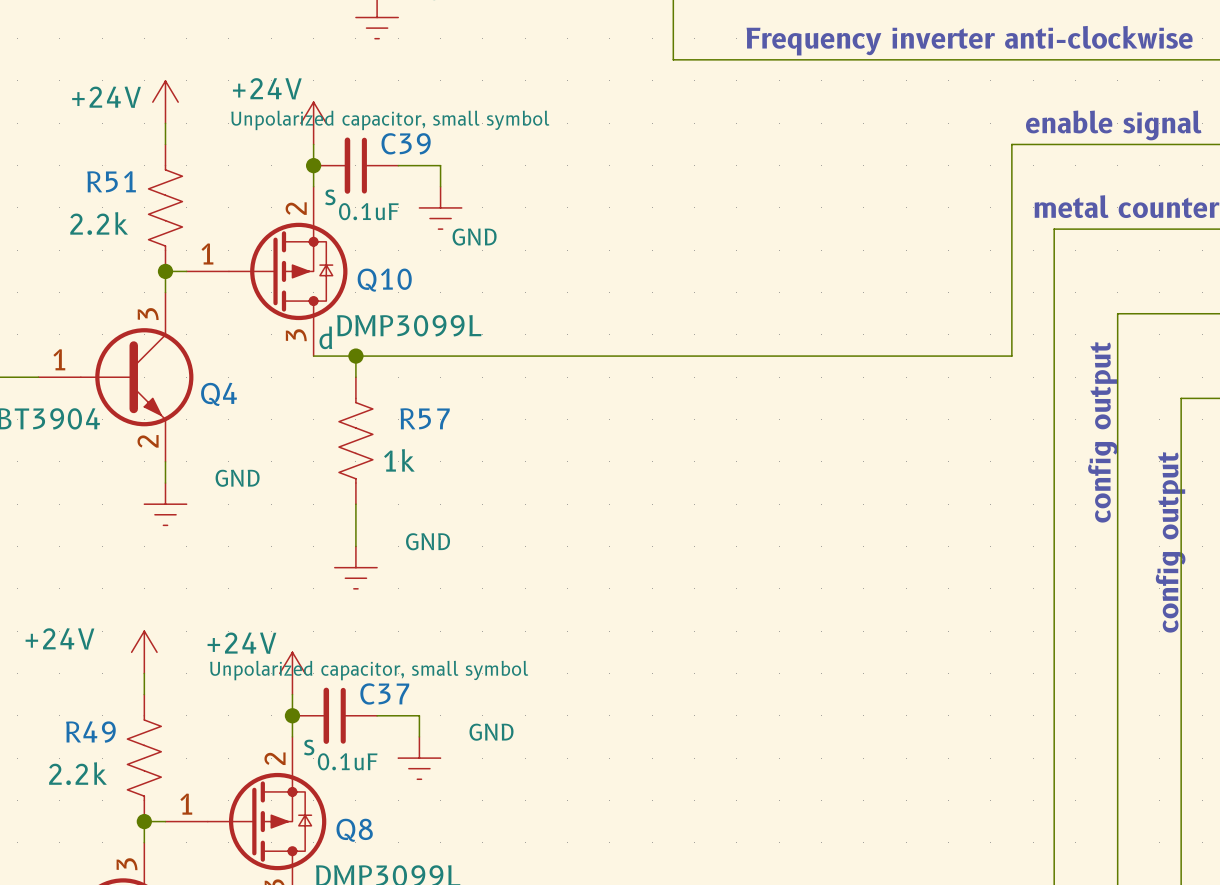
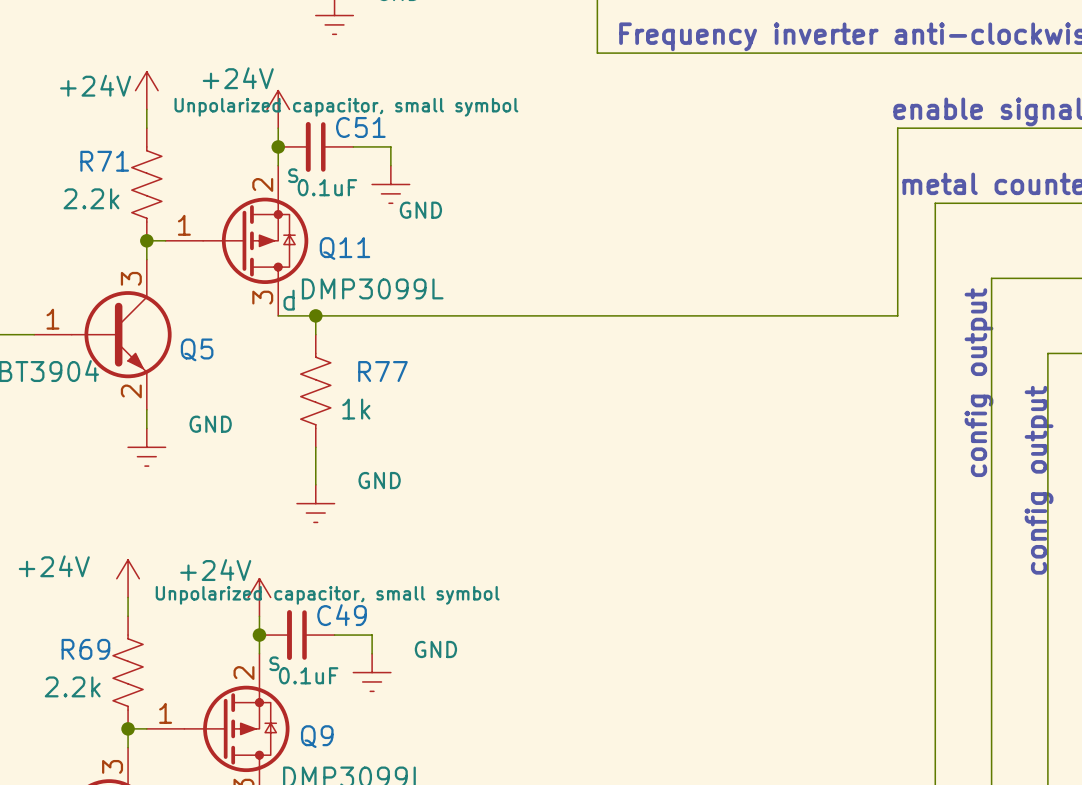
C39 name: C39 (406, 143) -> C51 (360, 127)
R51 name: R51 (111, 181) -> R71 (104, 161)
Q10 name: Q10 (384, 280) -> Q11 (344, 248)
Q4 name: Q4 (219, 394) -> Q5 (197, 349)
R57 name: R57 (425, 418) -> R77 (382, 371)
C37 name: C37 (384, 693) -> C49 (342, 615)
R49 name: R49 (90, 732) -> R69 (85, 649)
Q8 name: Q8 (354, 830) -> Q9 (317, 736)

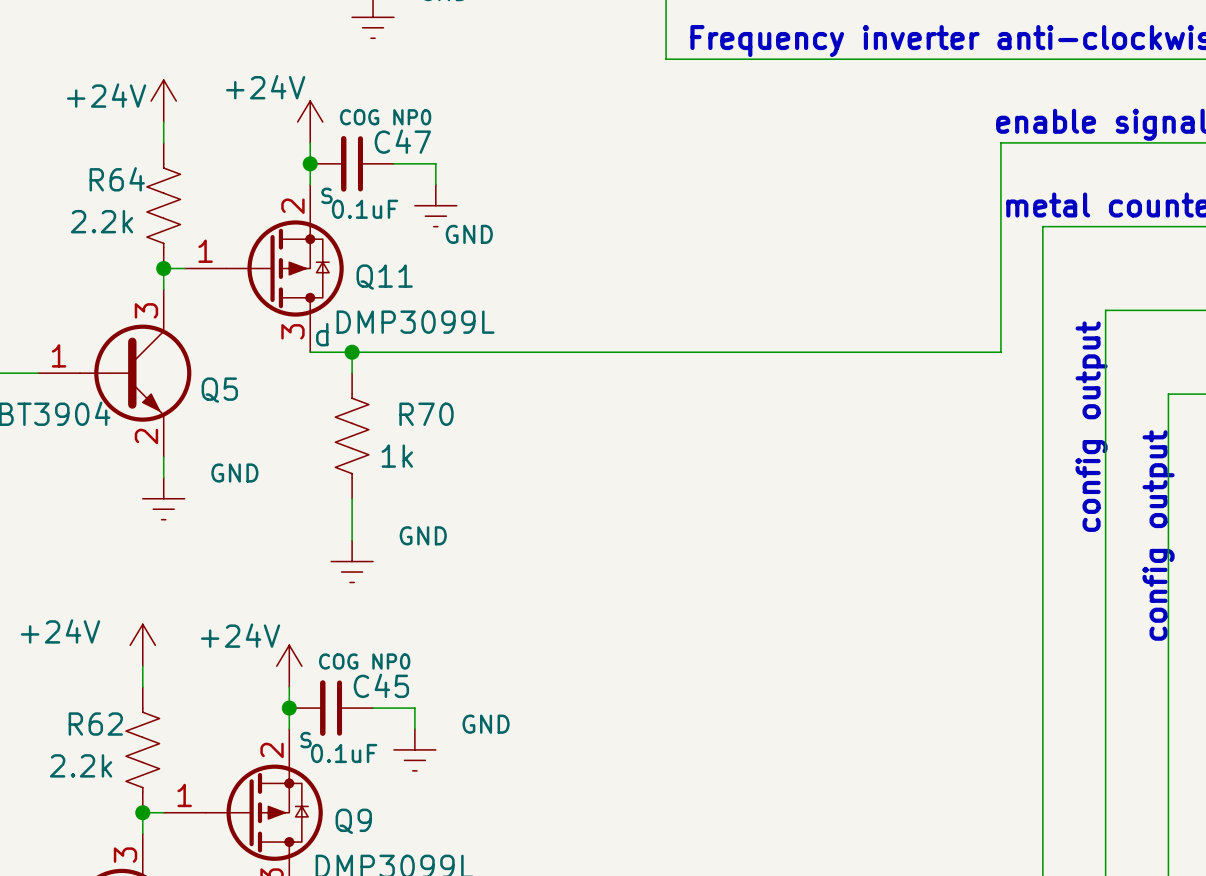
C51 text: Unpolarized capacitor, small symbol (346, 107) -> COG NP0 (385, 117)
C51 name: C51 (360, 127) -> C47 (402, 141)
R71 name: R71 (104, 161) -> R64 (117, 179)
R77 name: R77 (382, 371) -> R70 (426, 414)
C49 text: Unpolarized capacitor, small symbol (327, 595) -> COG NP0 (364, 661)
C49 name: C49 (342, 615) -> C45 (381, 685)
R69 name: R69 (85, 649) -> R62 (95, 724)

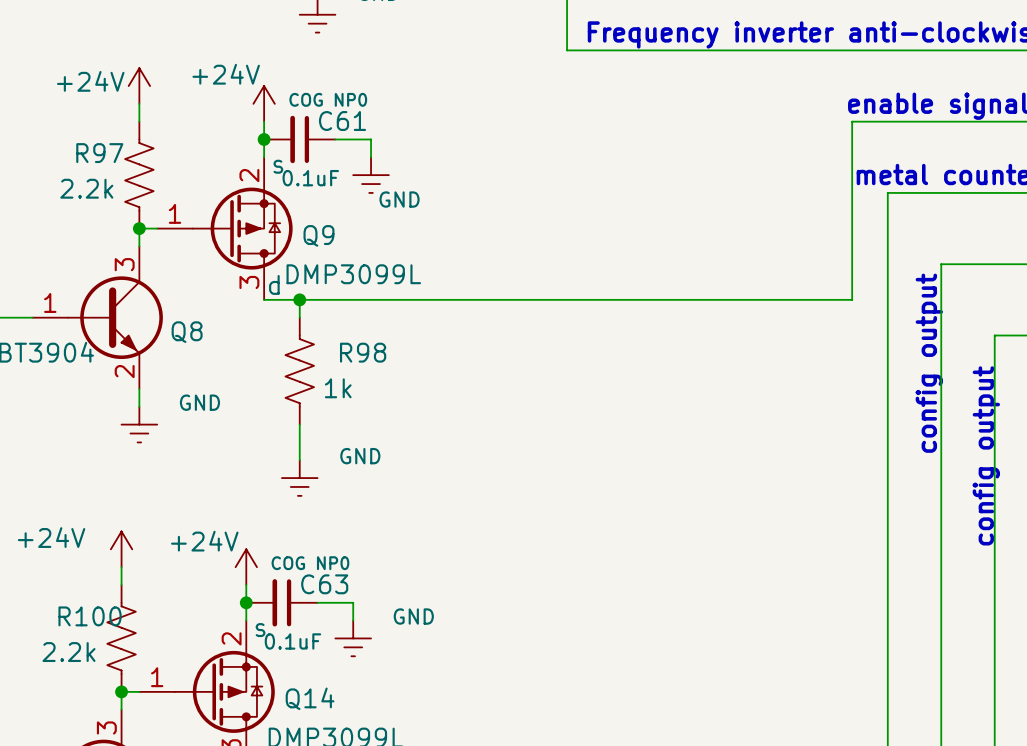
C47 name: C47 (402, 141) -> C61 (342, 121)
R64 name: R64 (117, 179) -> R97 (99, 153)
Q11 name: Q11 (384, 277) -> Q9 (318, 235)
Q5 name: Q5 (219, 390) -> Q8 (187, 332)
R70 name: R70 (426, 414) -> R98 (363, 352)
C45 name: C45 (381, 685) -> C63 (324, 584)
R62 name: R62 (95, 724) -> R100 (90, 616)
Q9 name: Q9 (353, 821) -> Q14 (310, 698)

